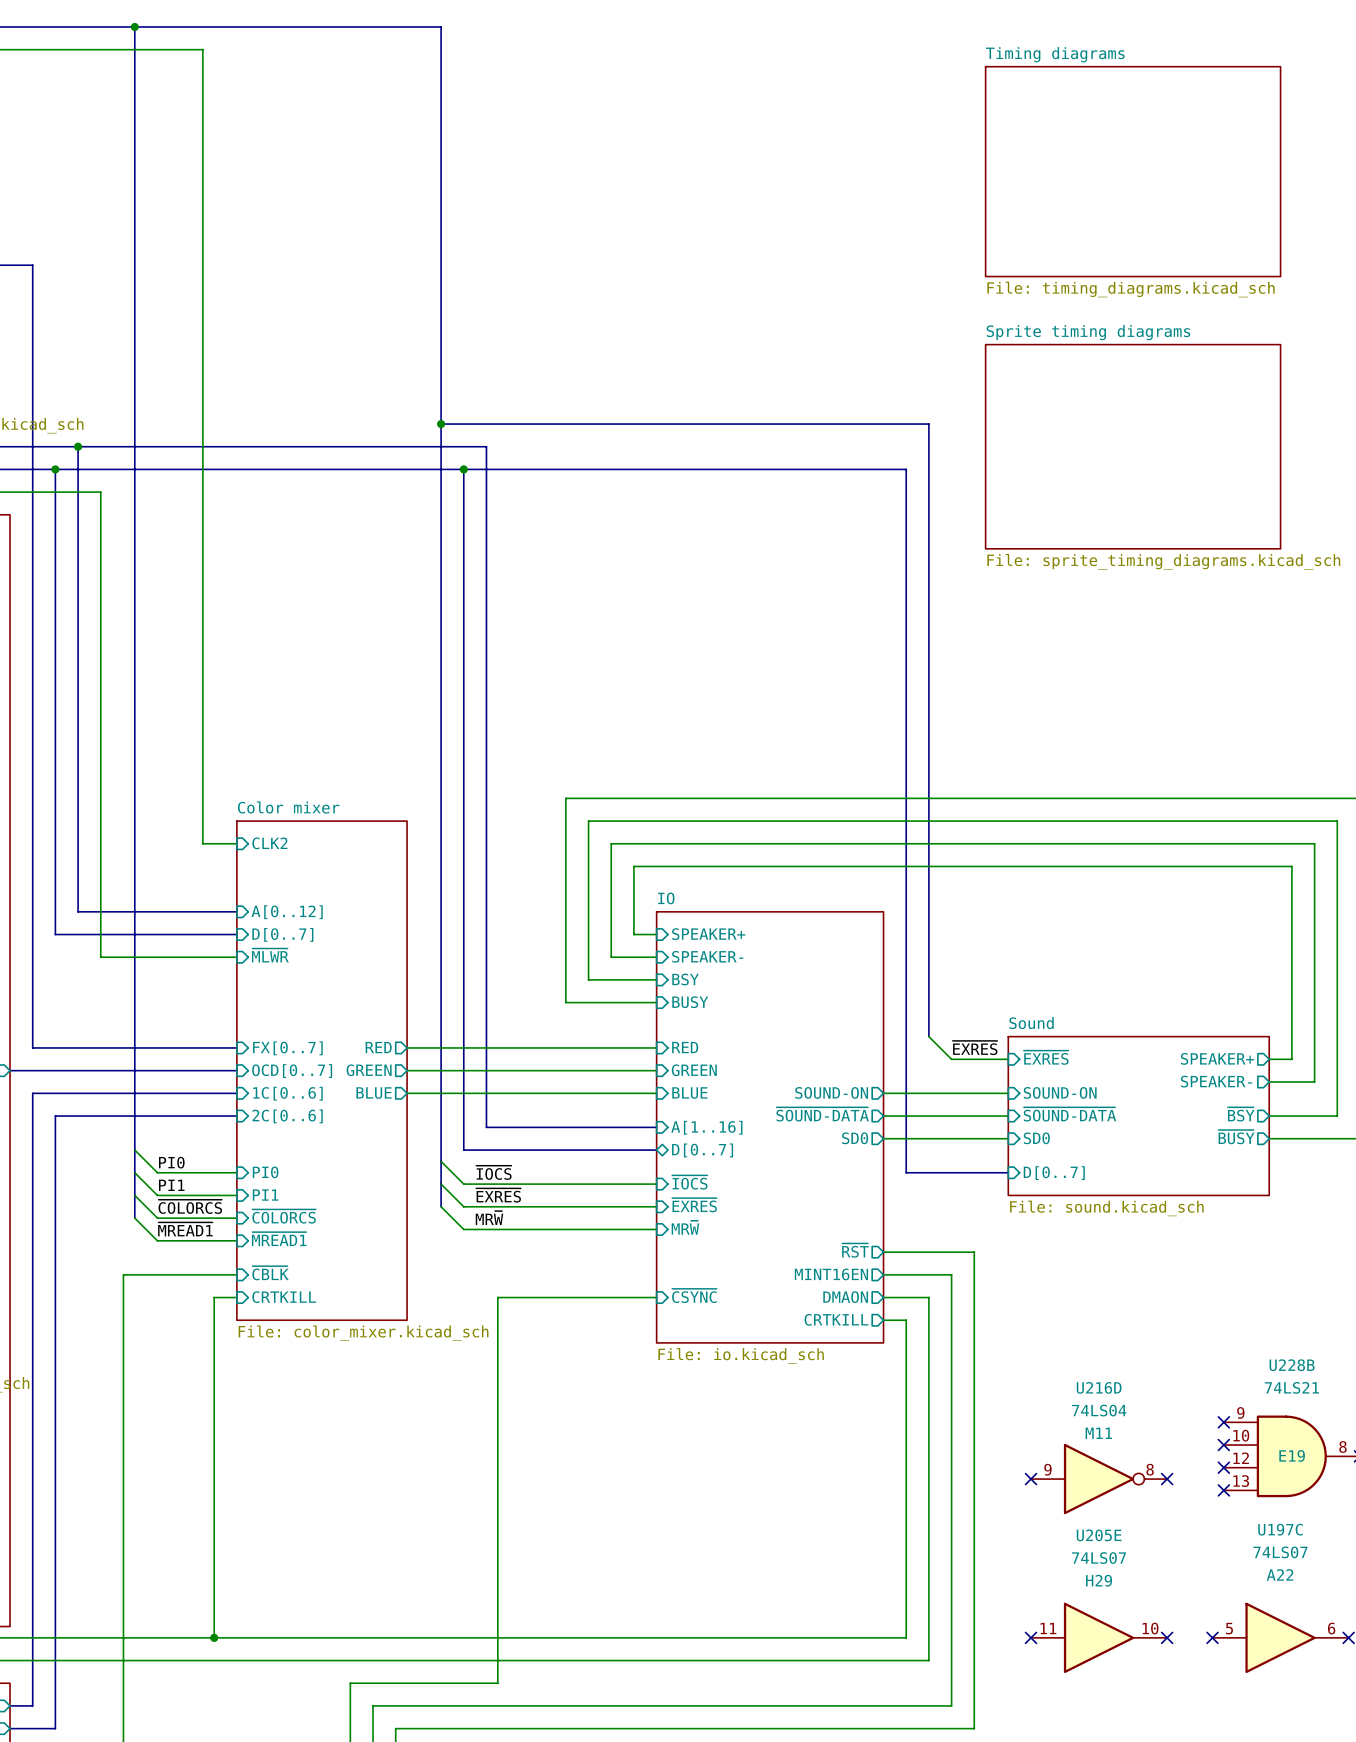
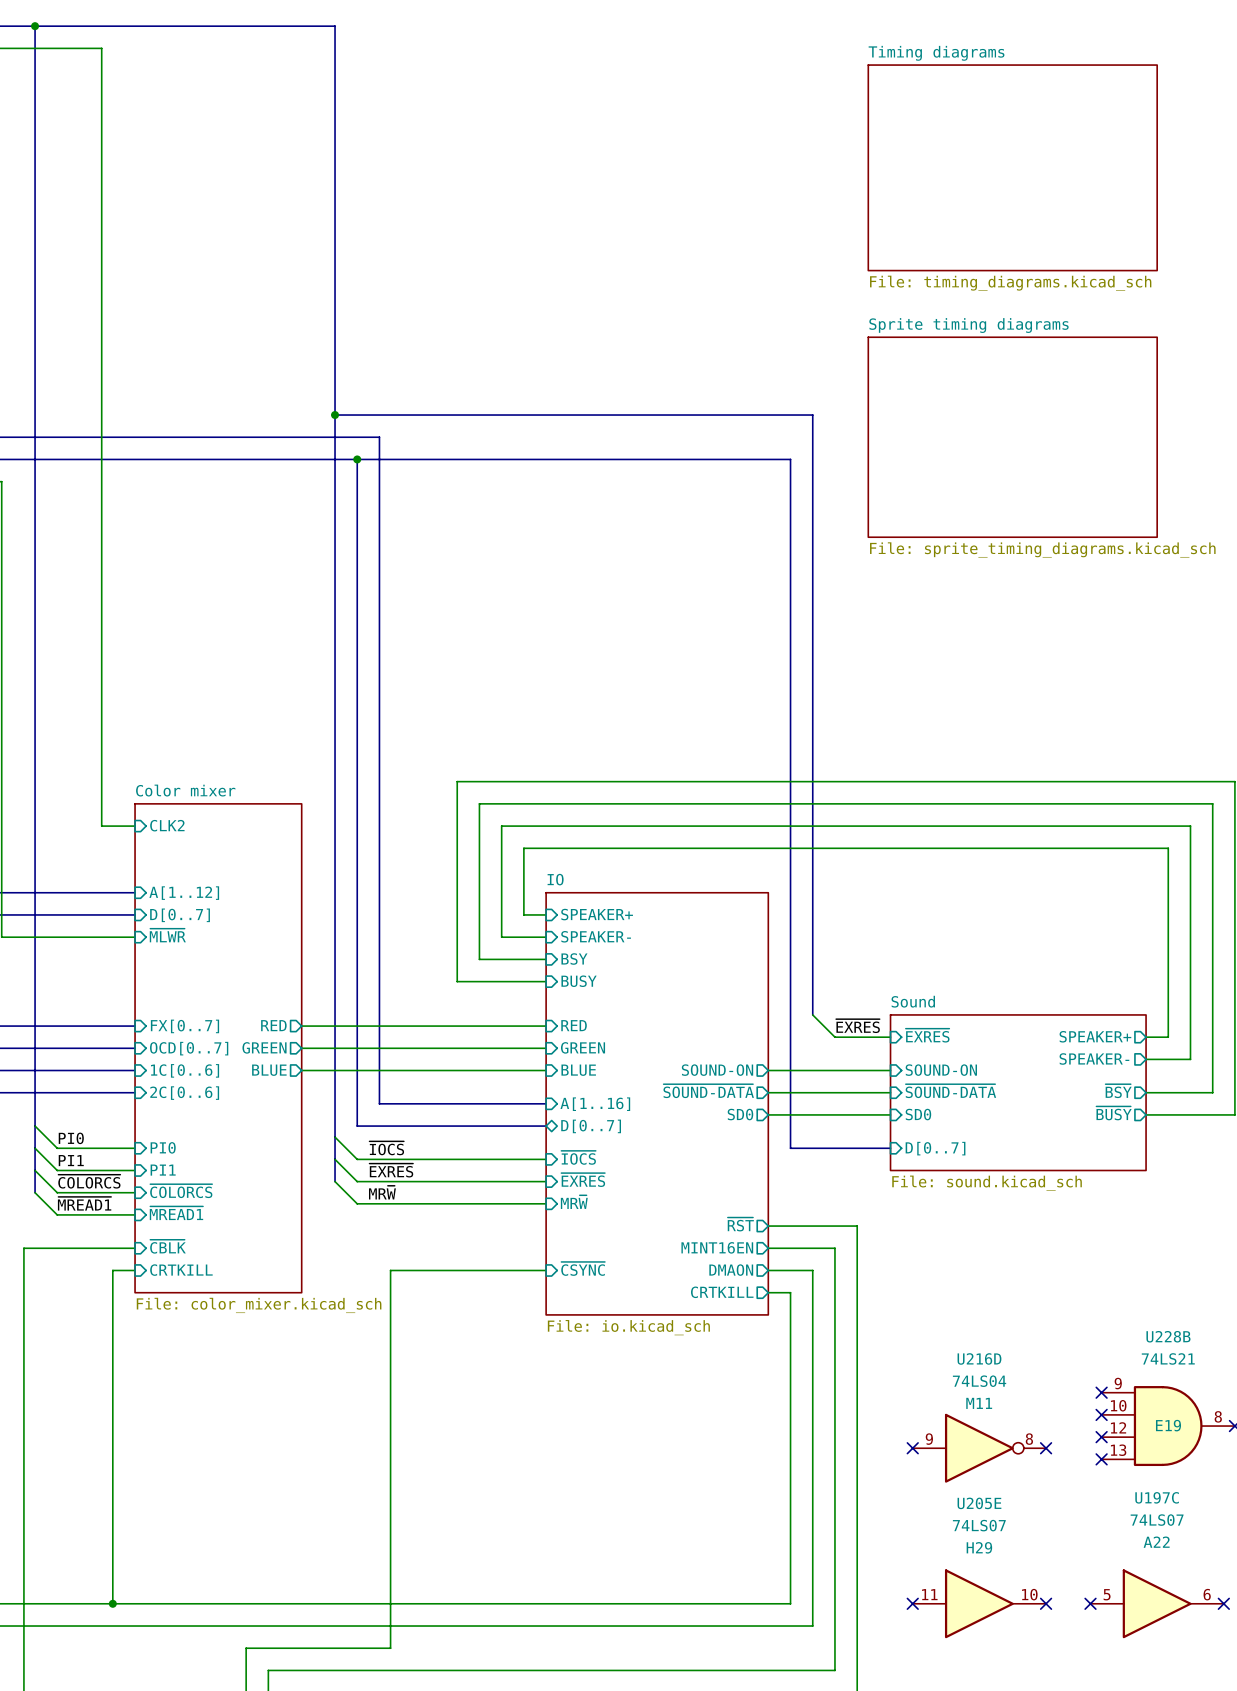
sheet pin: A[0..12] (287, 912) -> A[1..12] (184, 893)

